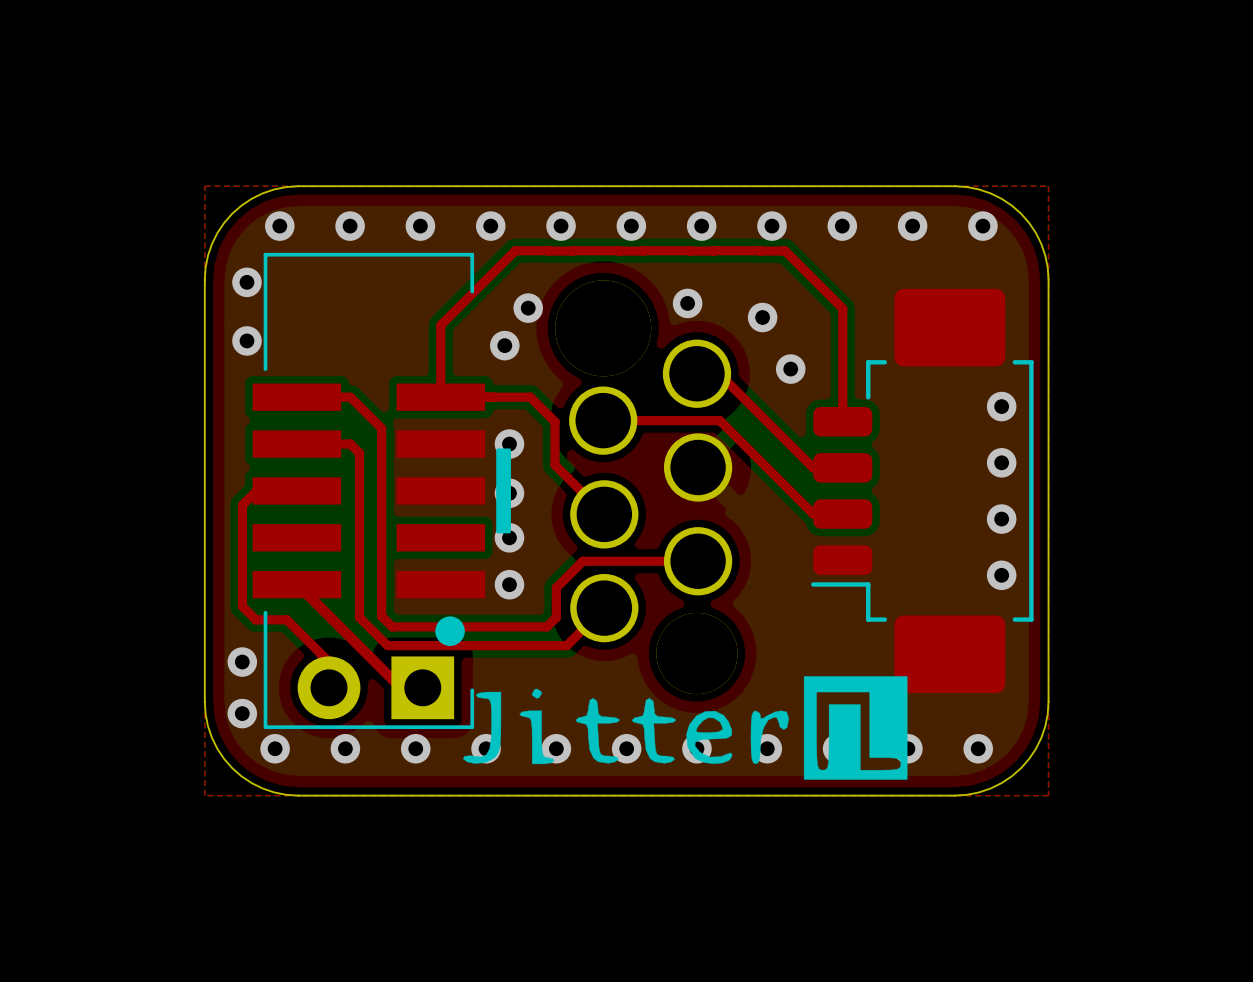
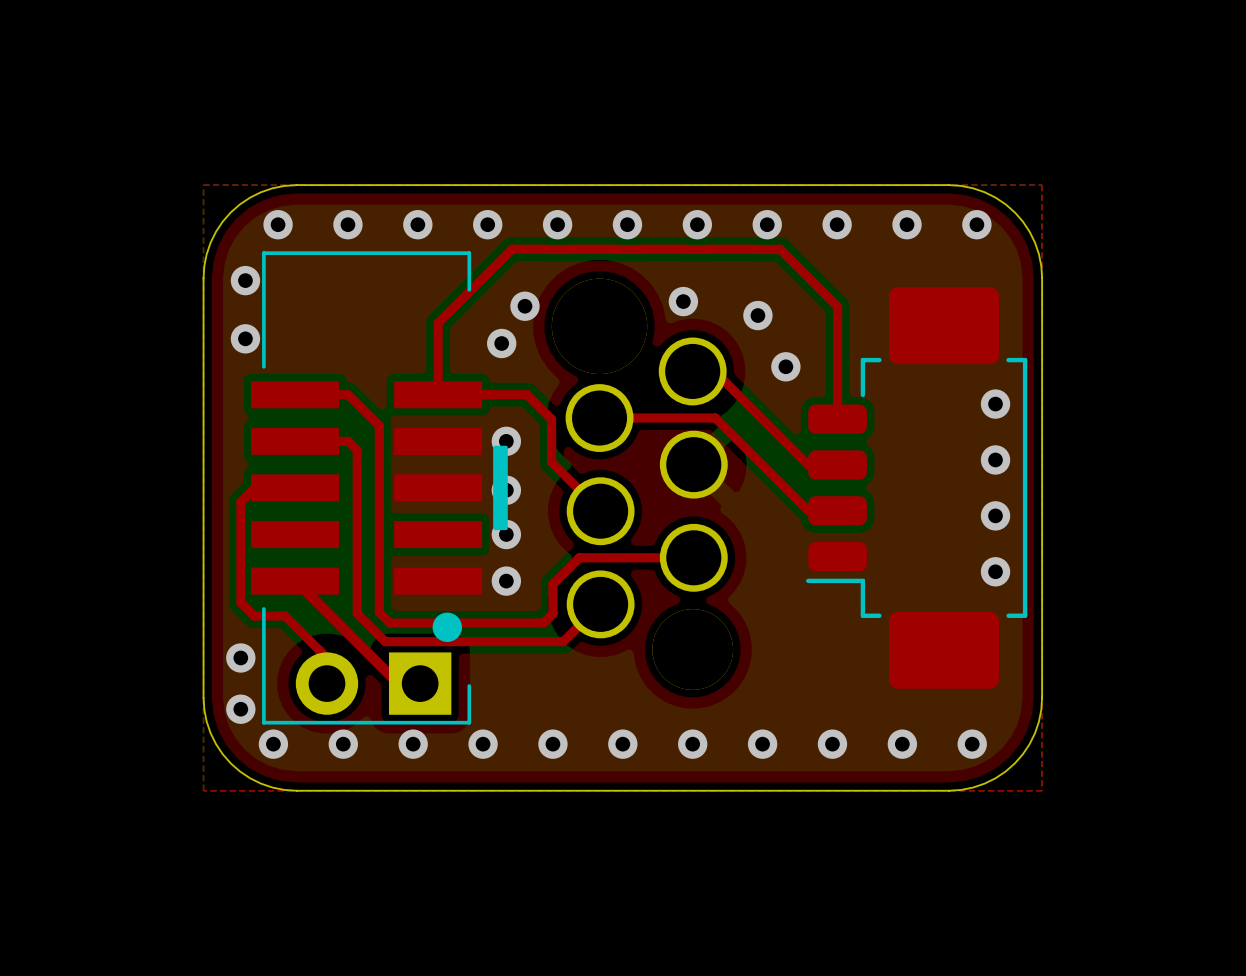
drawing: [463, 676, 908, 780] -> none

